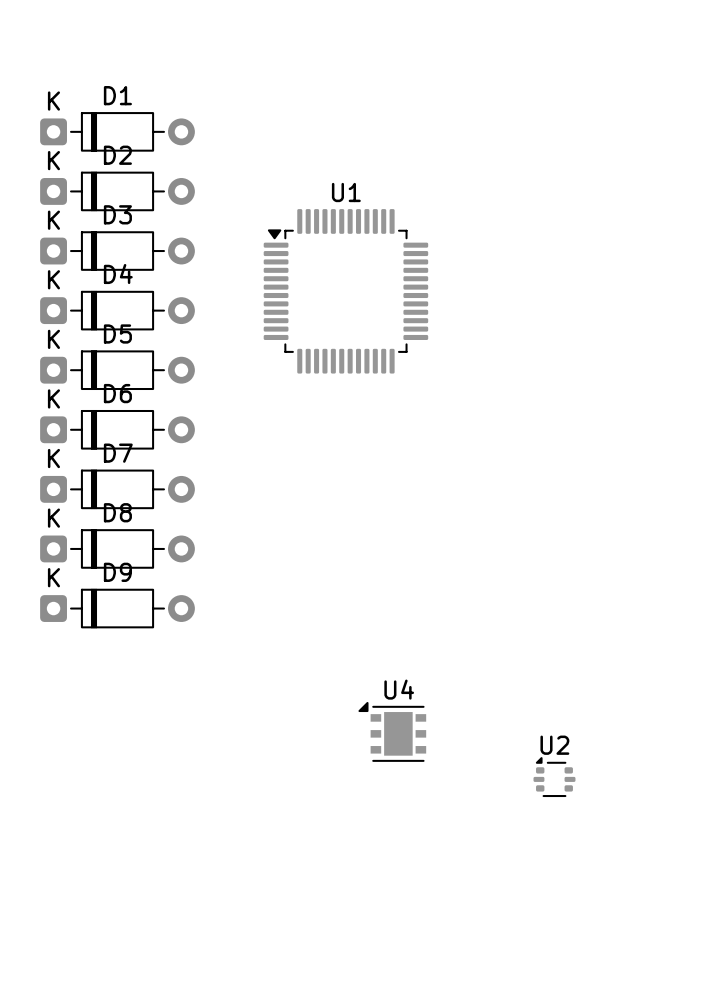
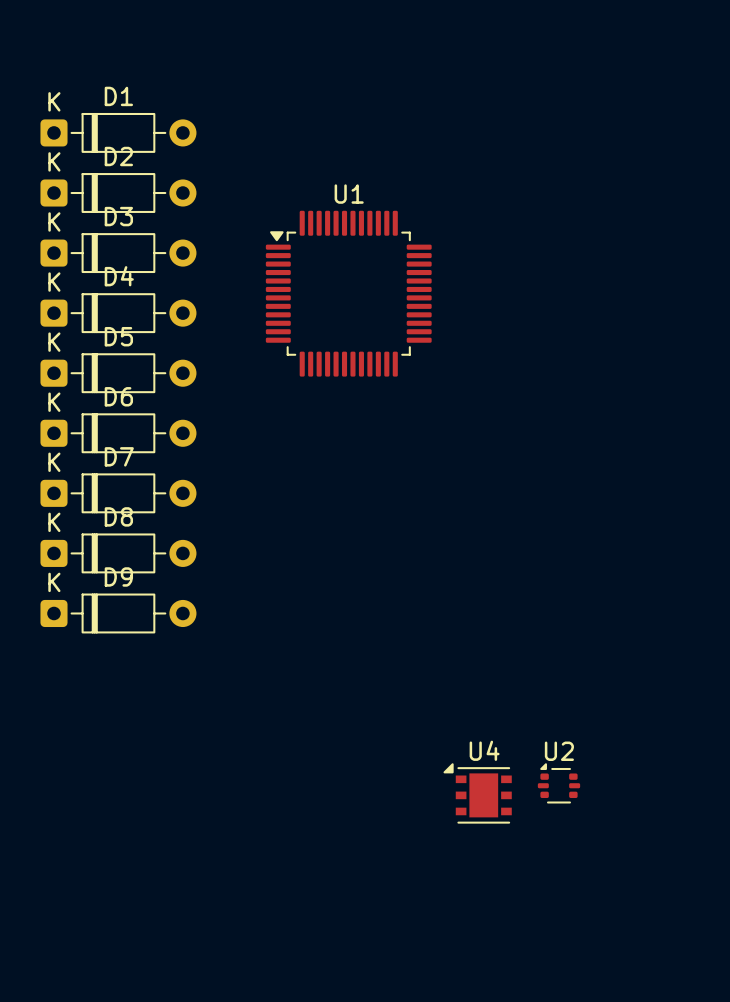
U4 position: (392, 731) -> (477, 793)

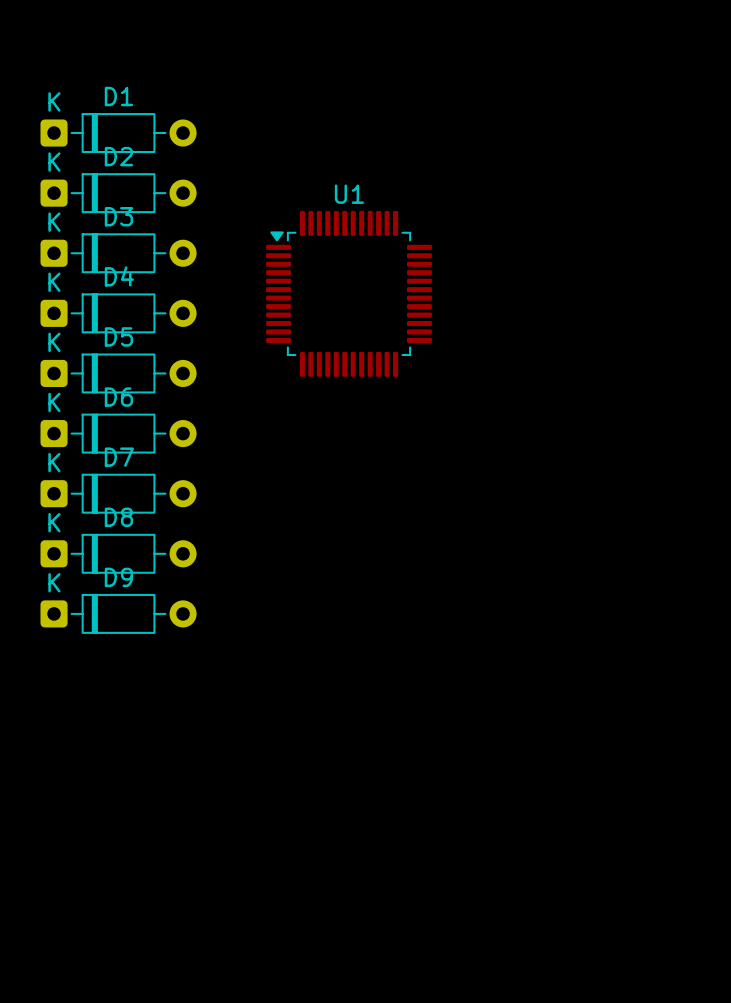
U2: (558, 783) -> none
U4: (477, 793) -> none

